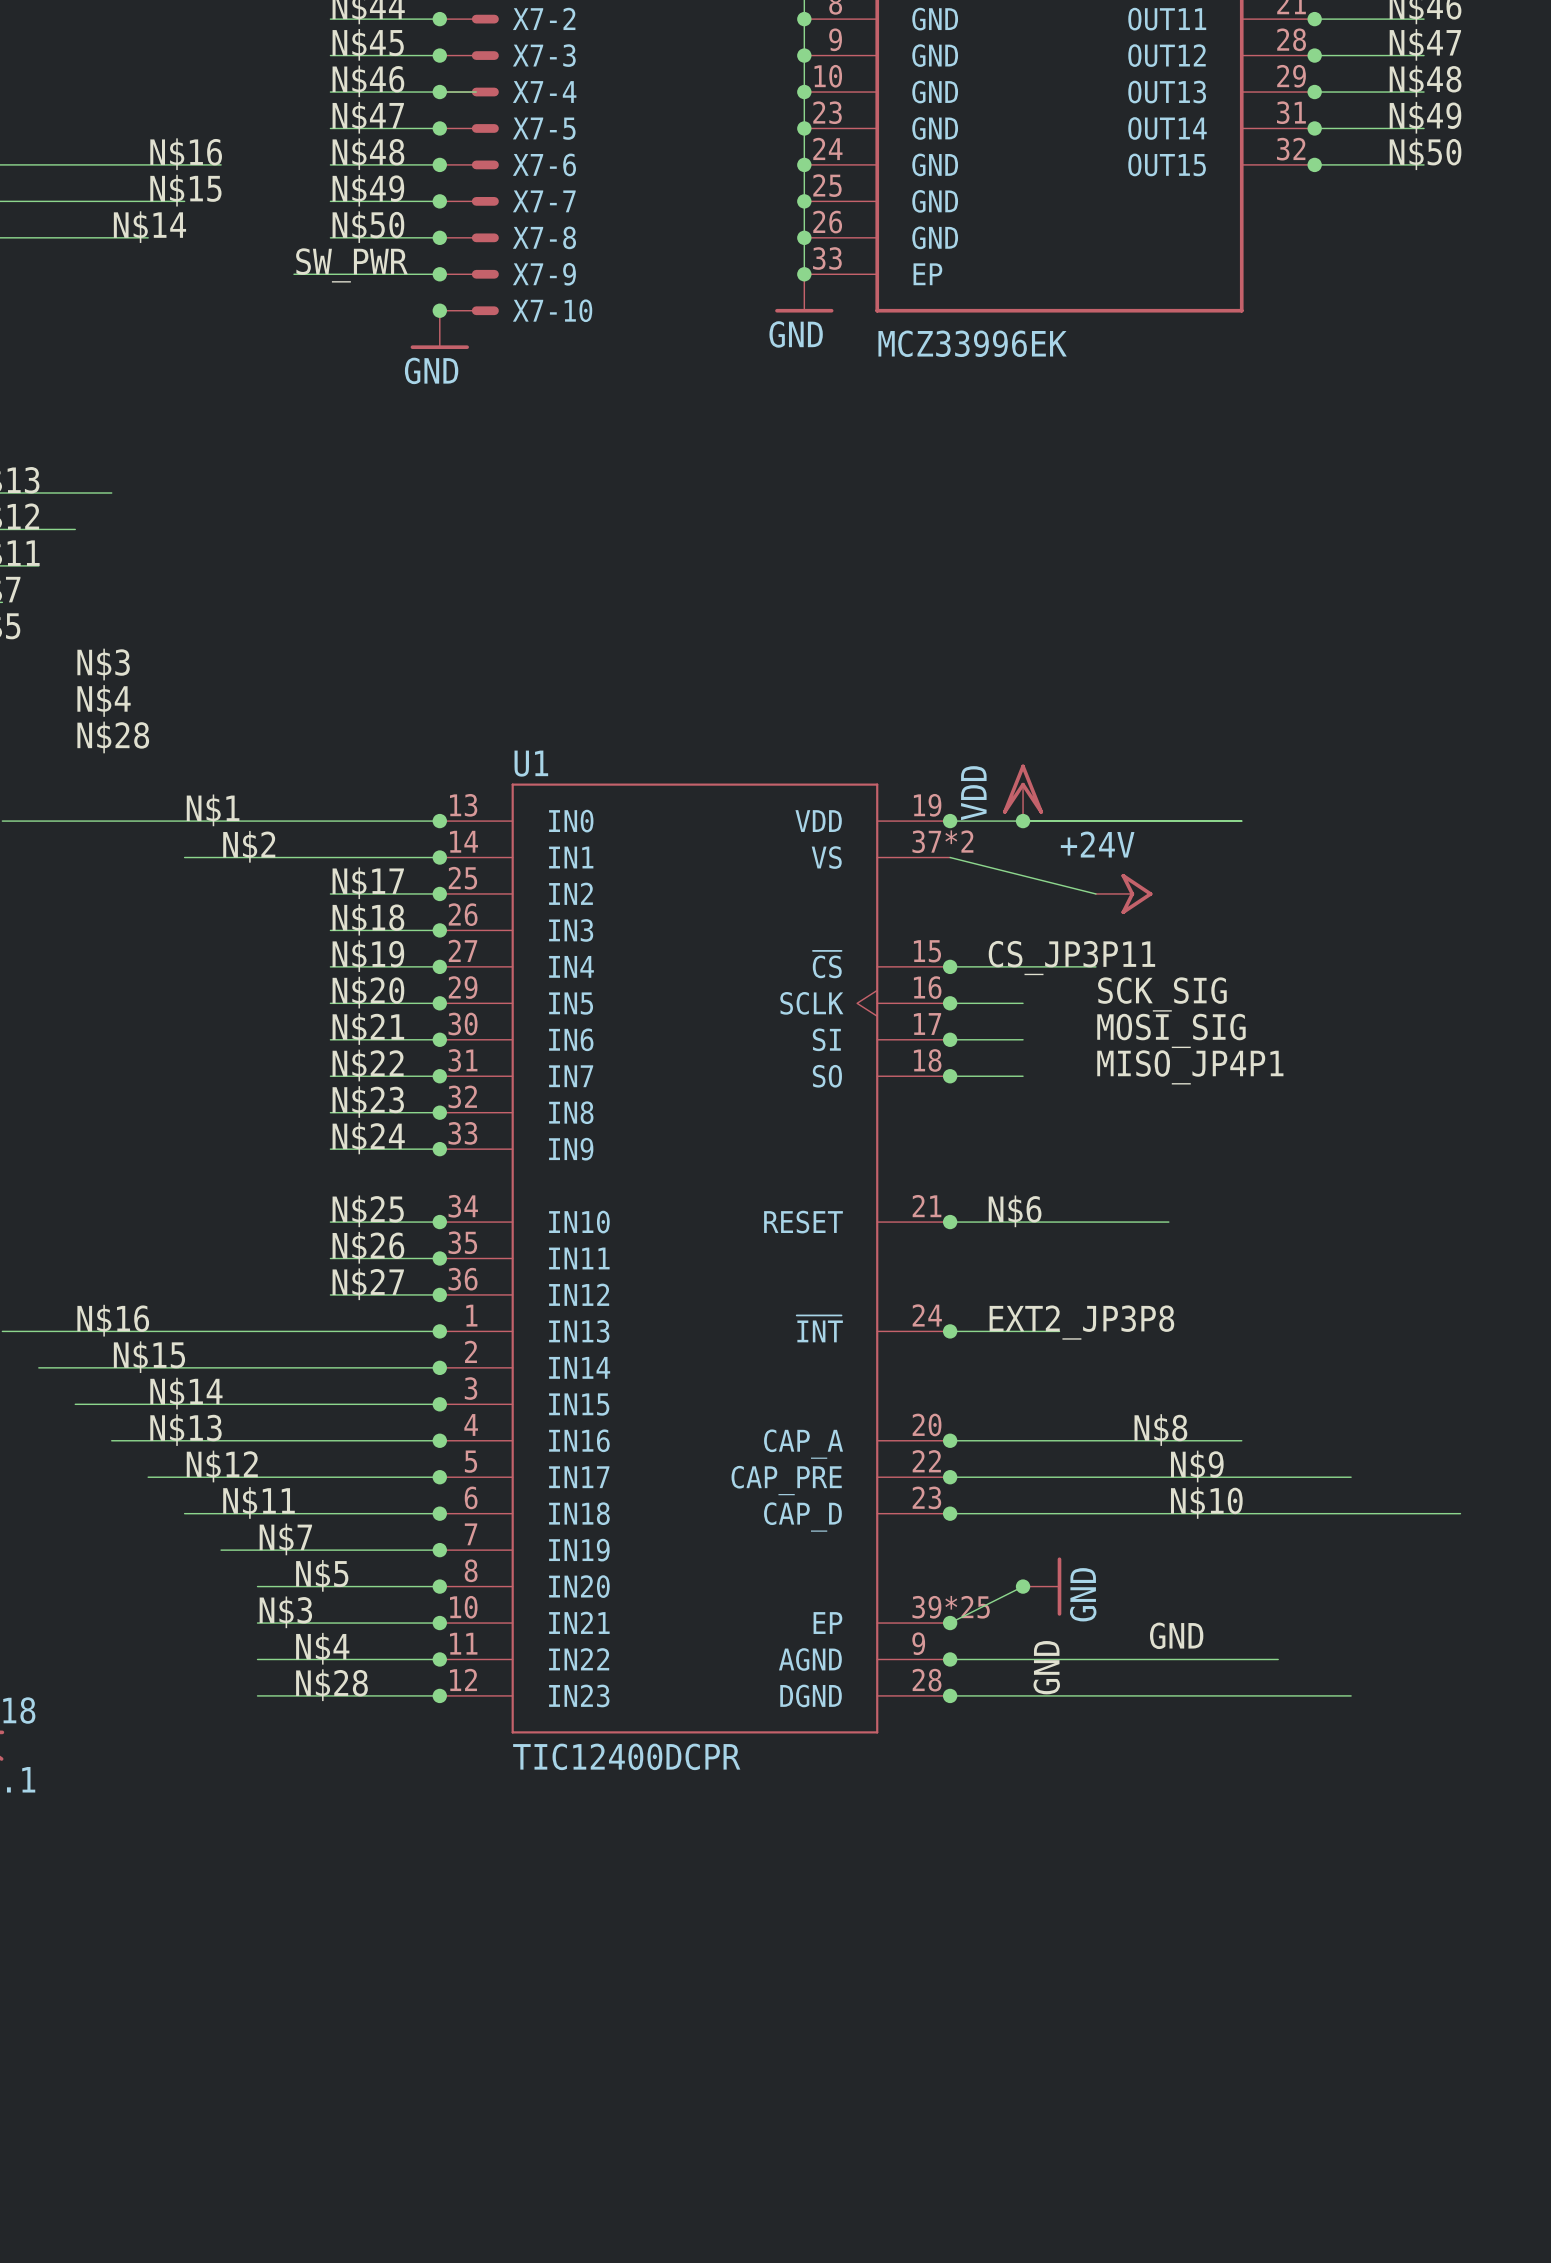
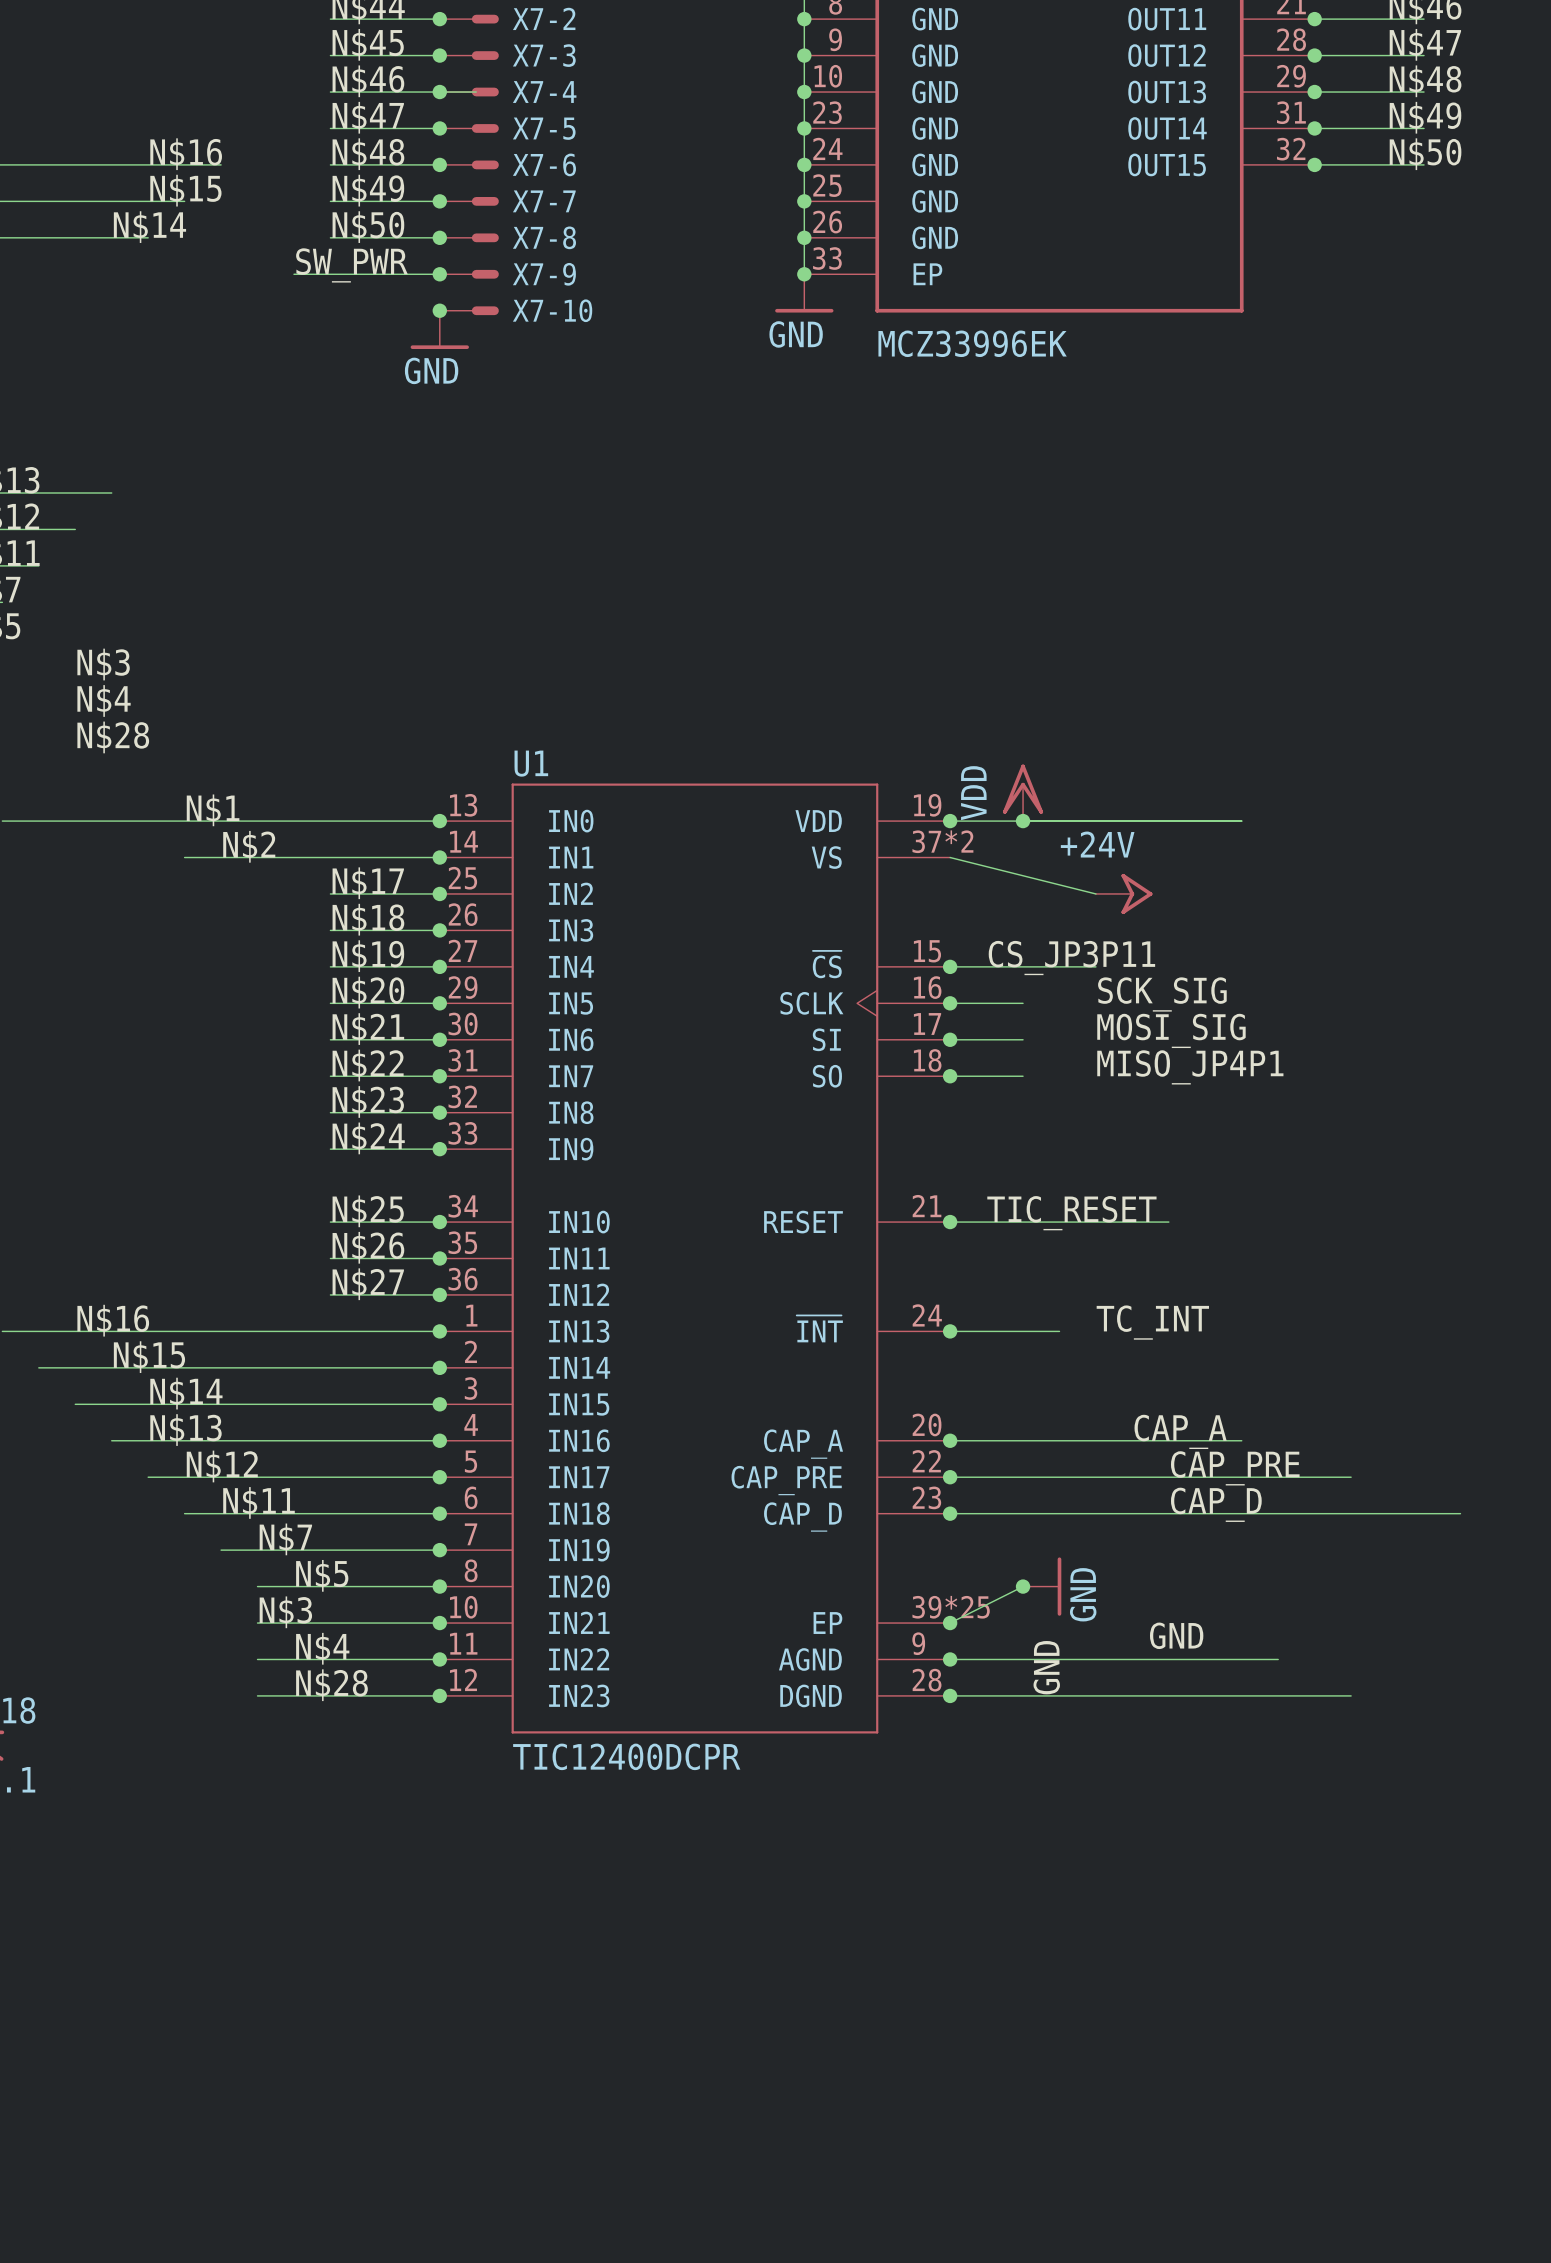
label: N$6 (1015, 1211) -> TIC_RESET (1071, 1213)
label: EXT2_JP3P8 (1081, 1322) -> none
label: none -> TC_INT (1152, 1322)
label: N$8 (1160, 1430) -> CAP_A (1180, 1431)
label: N$9 (1197, 1466) -> CAP_PRE (1235, 1468)
label: N$10 (1206, 1502) -> CAP_D (1216, 1504)

